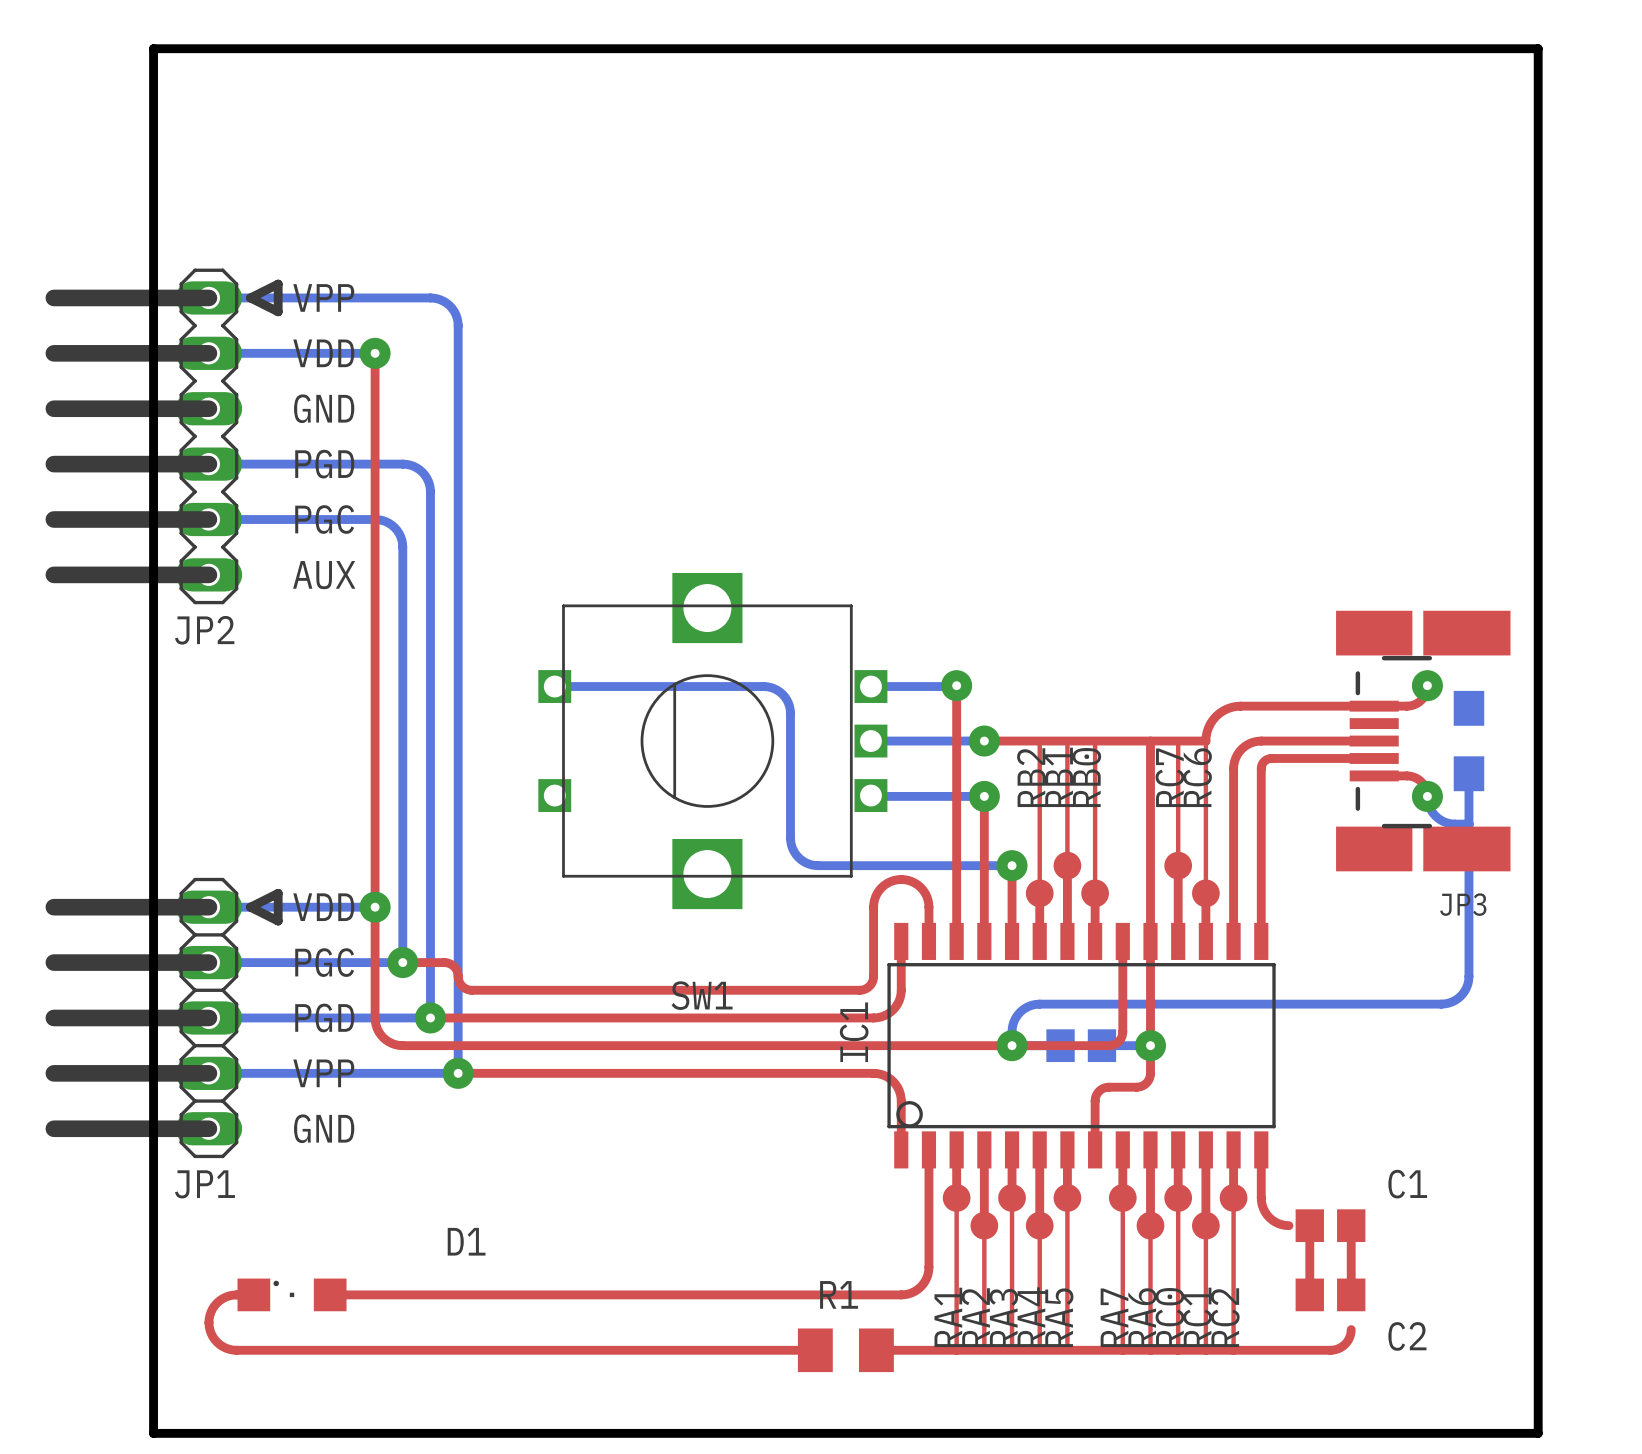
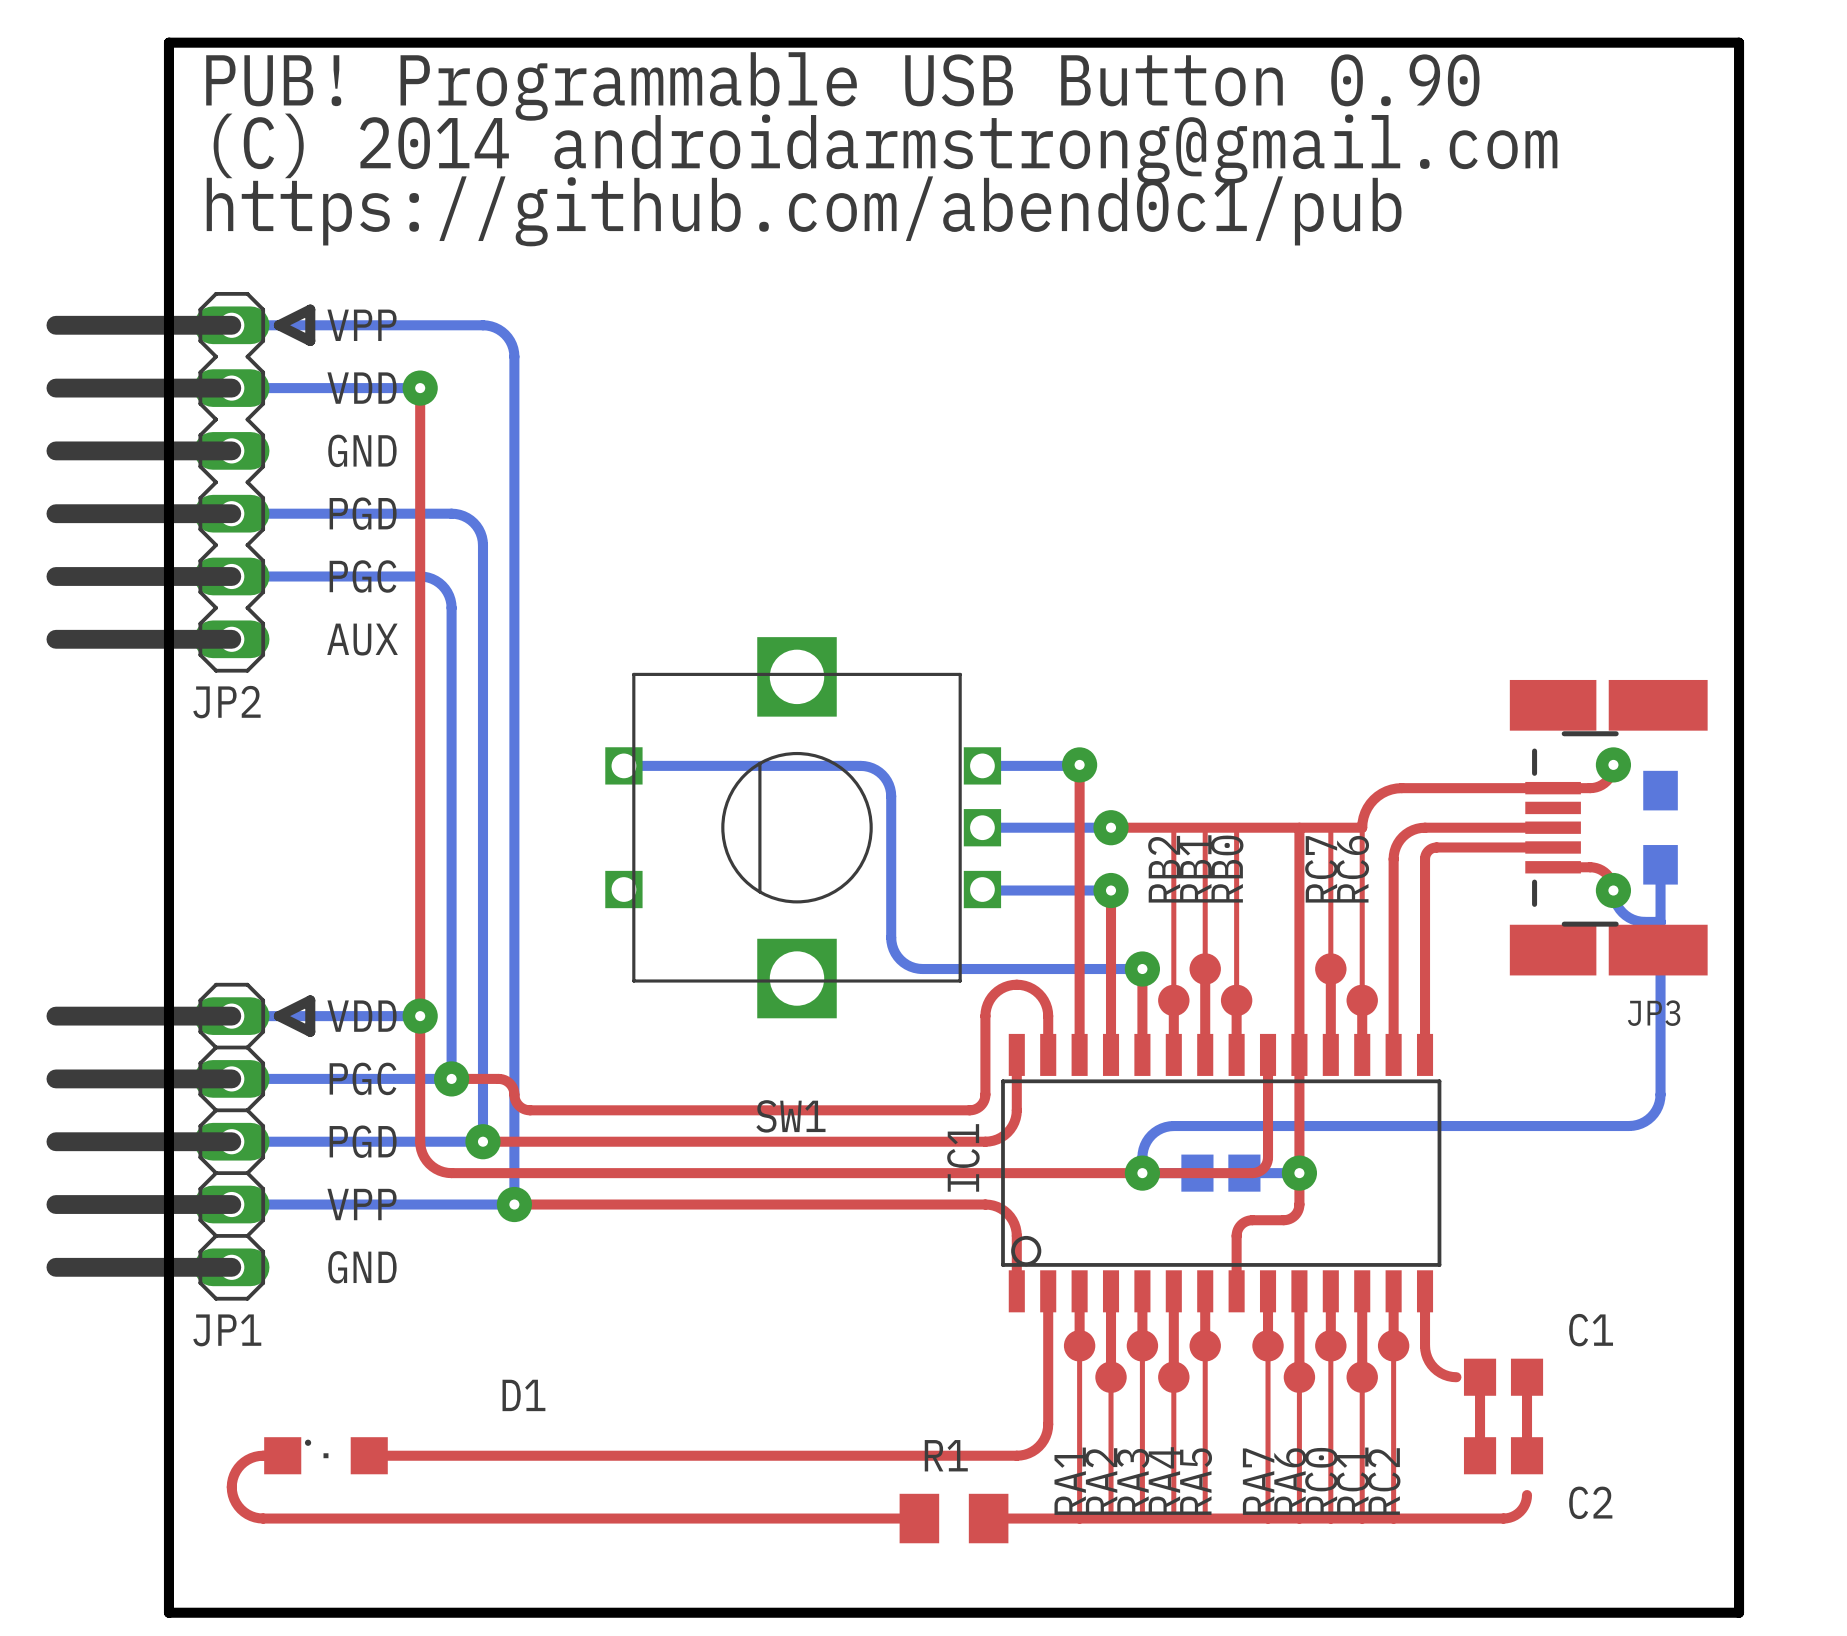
text: none -> PUB! Programmable USB Button 0.90 (842, 86)
text: none -> (C) 2014 androidarmstrong@gmail.com (885, 148)
text: none -> https://github.com/abend0c1/pub (804, 211)

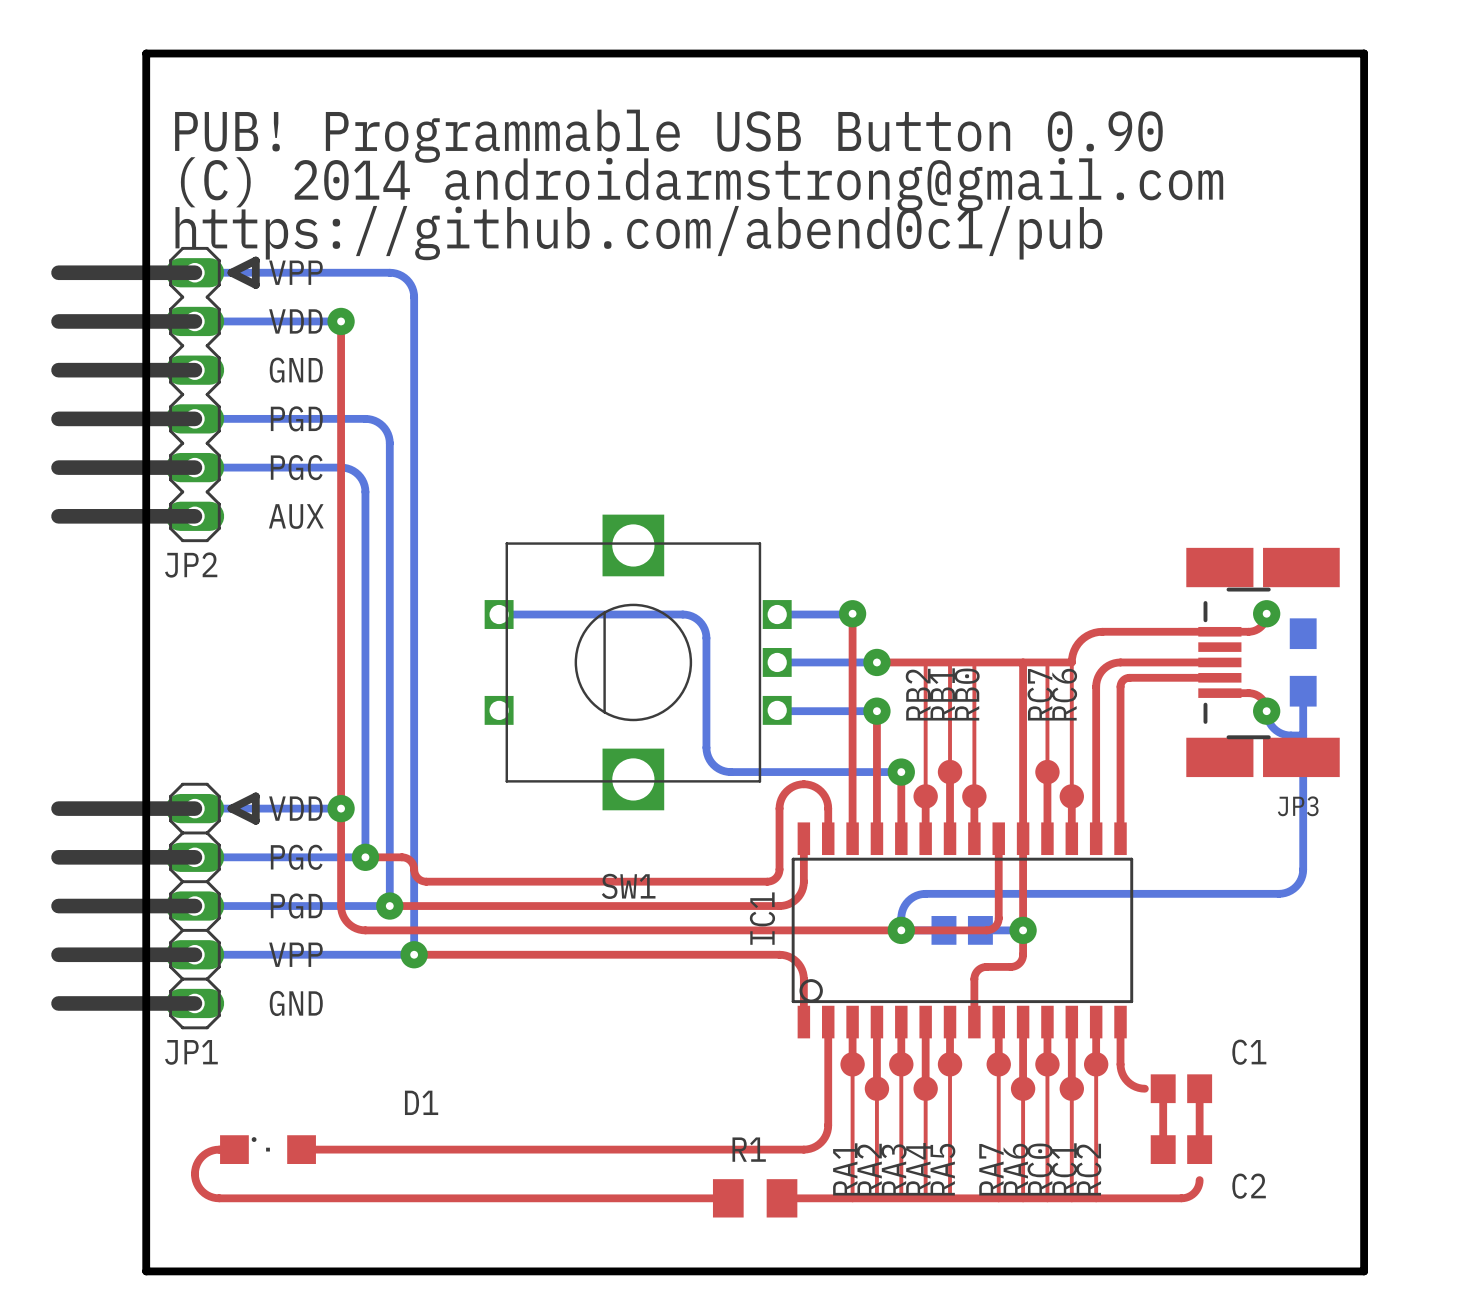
text: PUB! Programmable USB Button 0.90 (842, 86) -> none
text: (C) 2014 androidarmstrong@gmail.com (885, 148) -> PUB! Programmable USB Button 0.90 (668, 136)
text: https://github.com/abend0c1/pub (804, 211) -> (C) 2014 androidarmstrong@gmail.com (702, 184)
text: none -> https://github.com/abend0c1/pub (638, 233)

